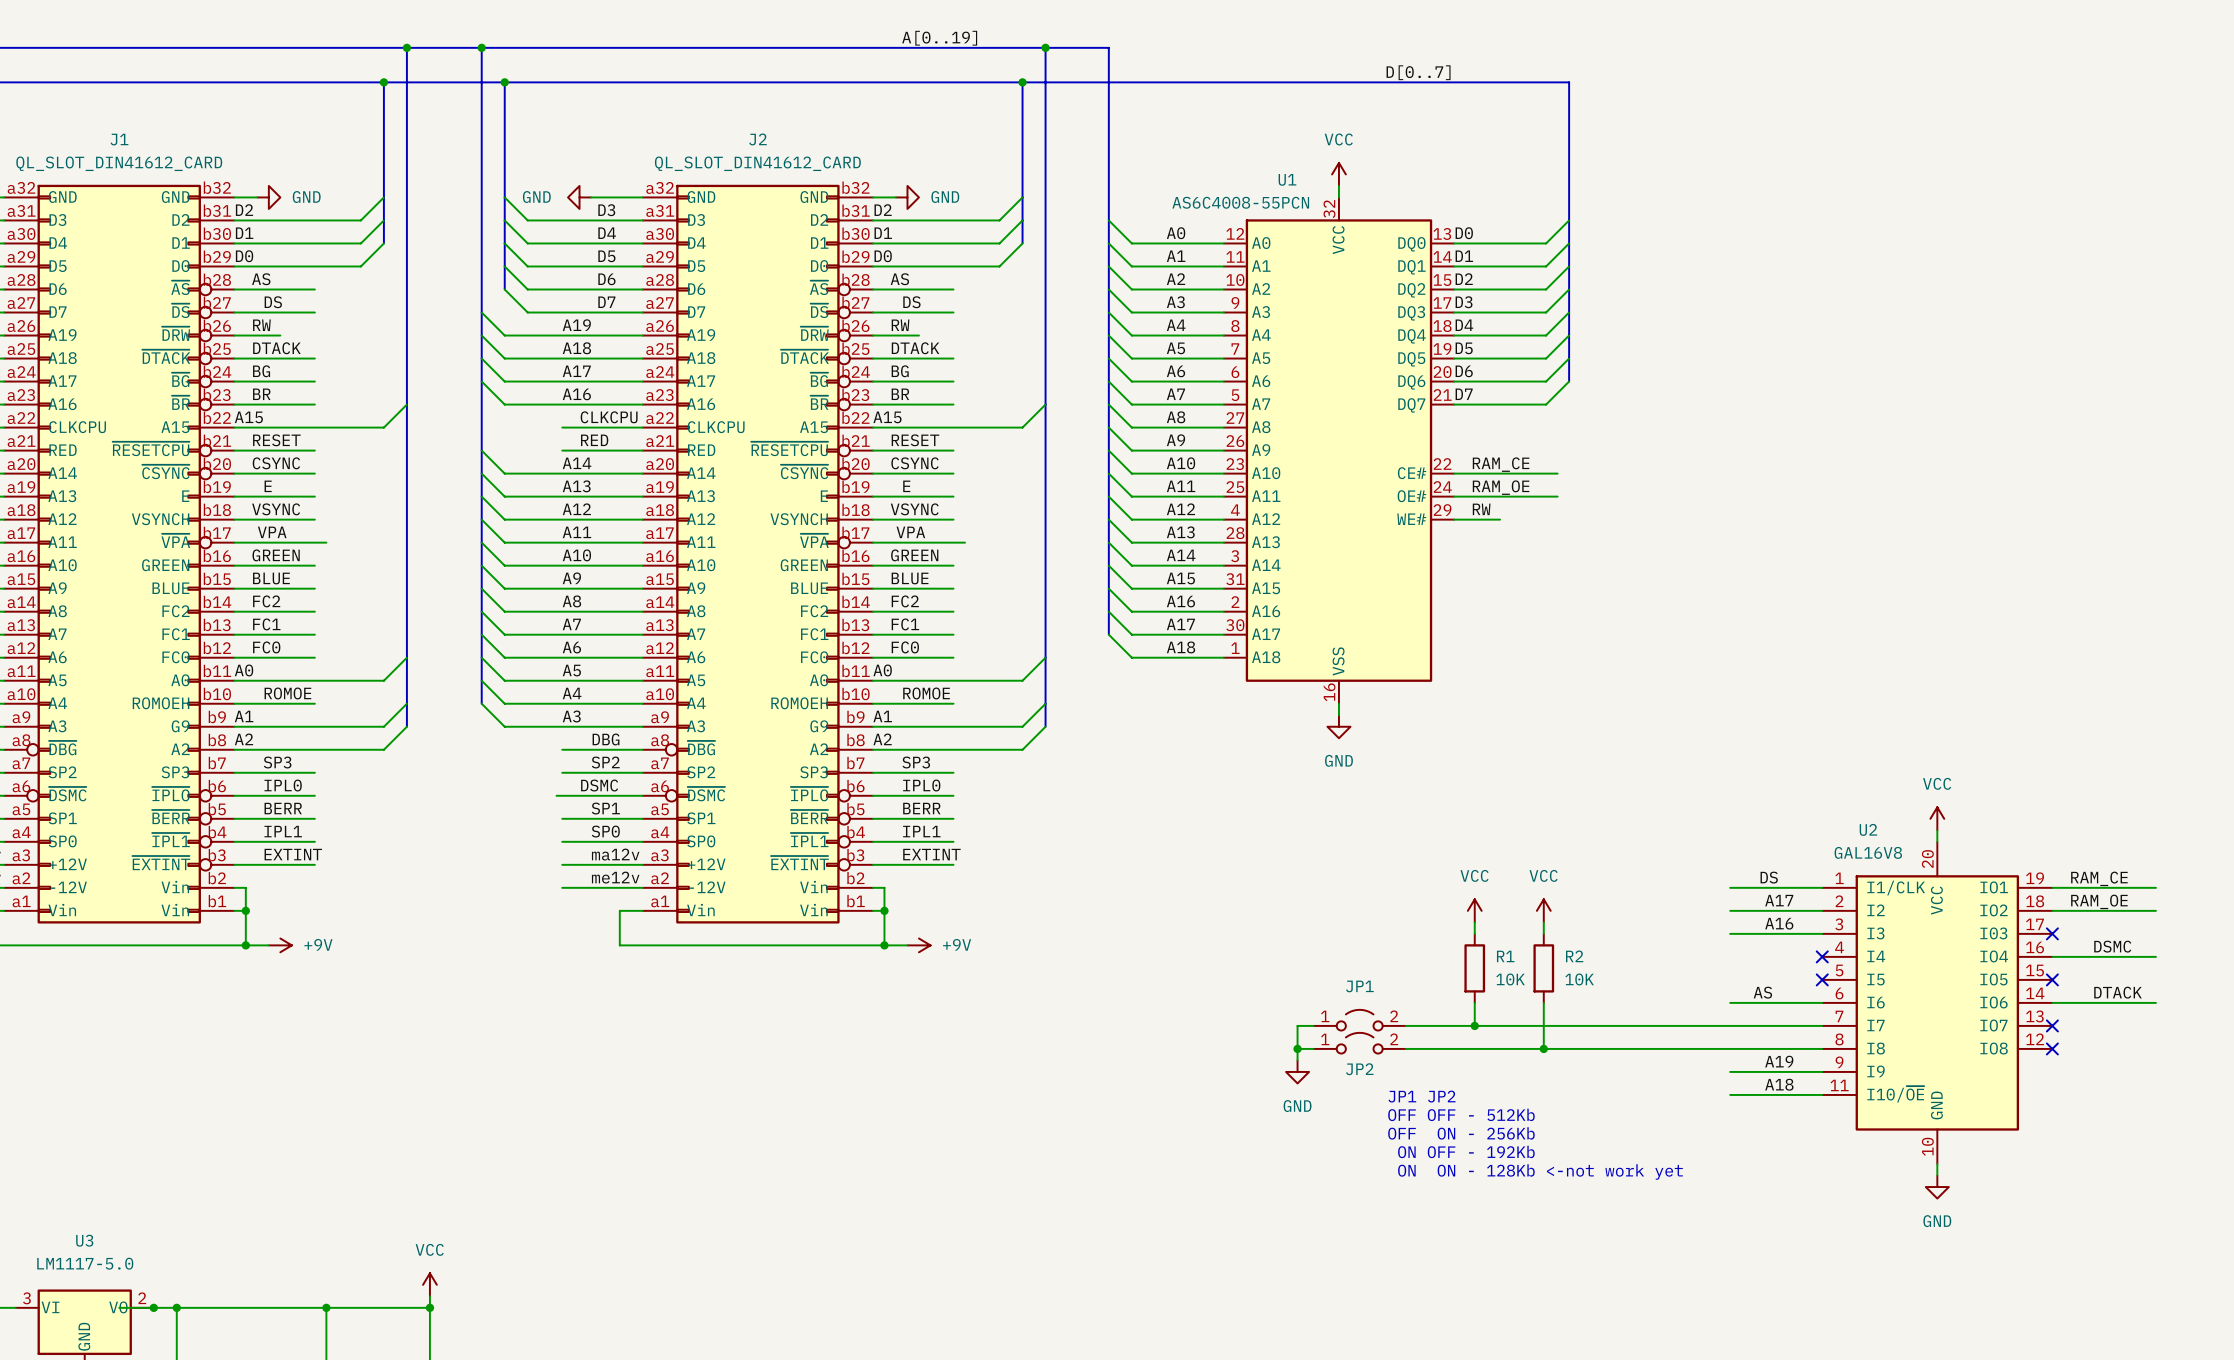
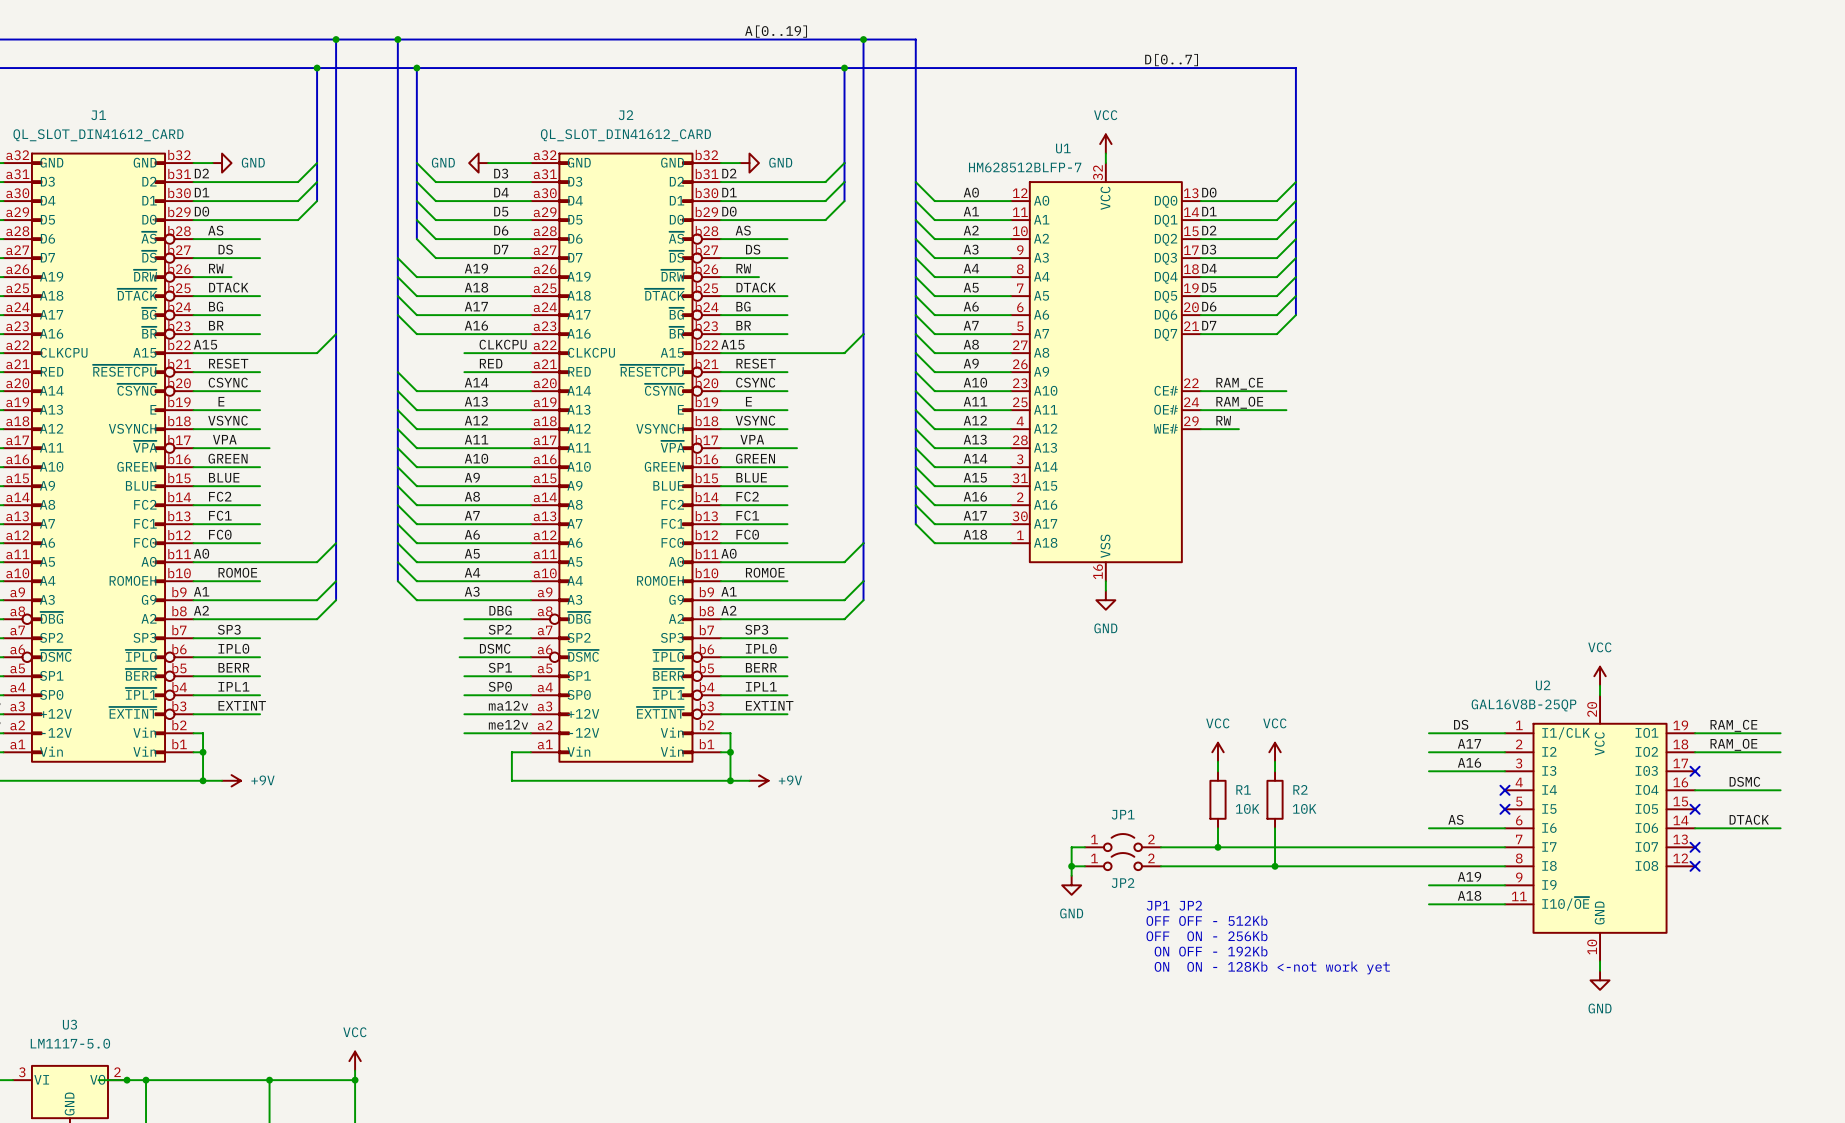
U1 value: AS6C4008-55PCN (1240, 202) -> HM628512BLFP-7 (1025, 167)
U2 value: GAL16V8 (1868, 852) -> GAL16V8B-25QP (1524, 705)

